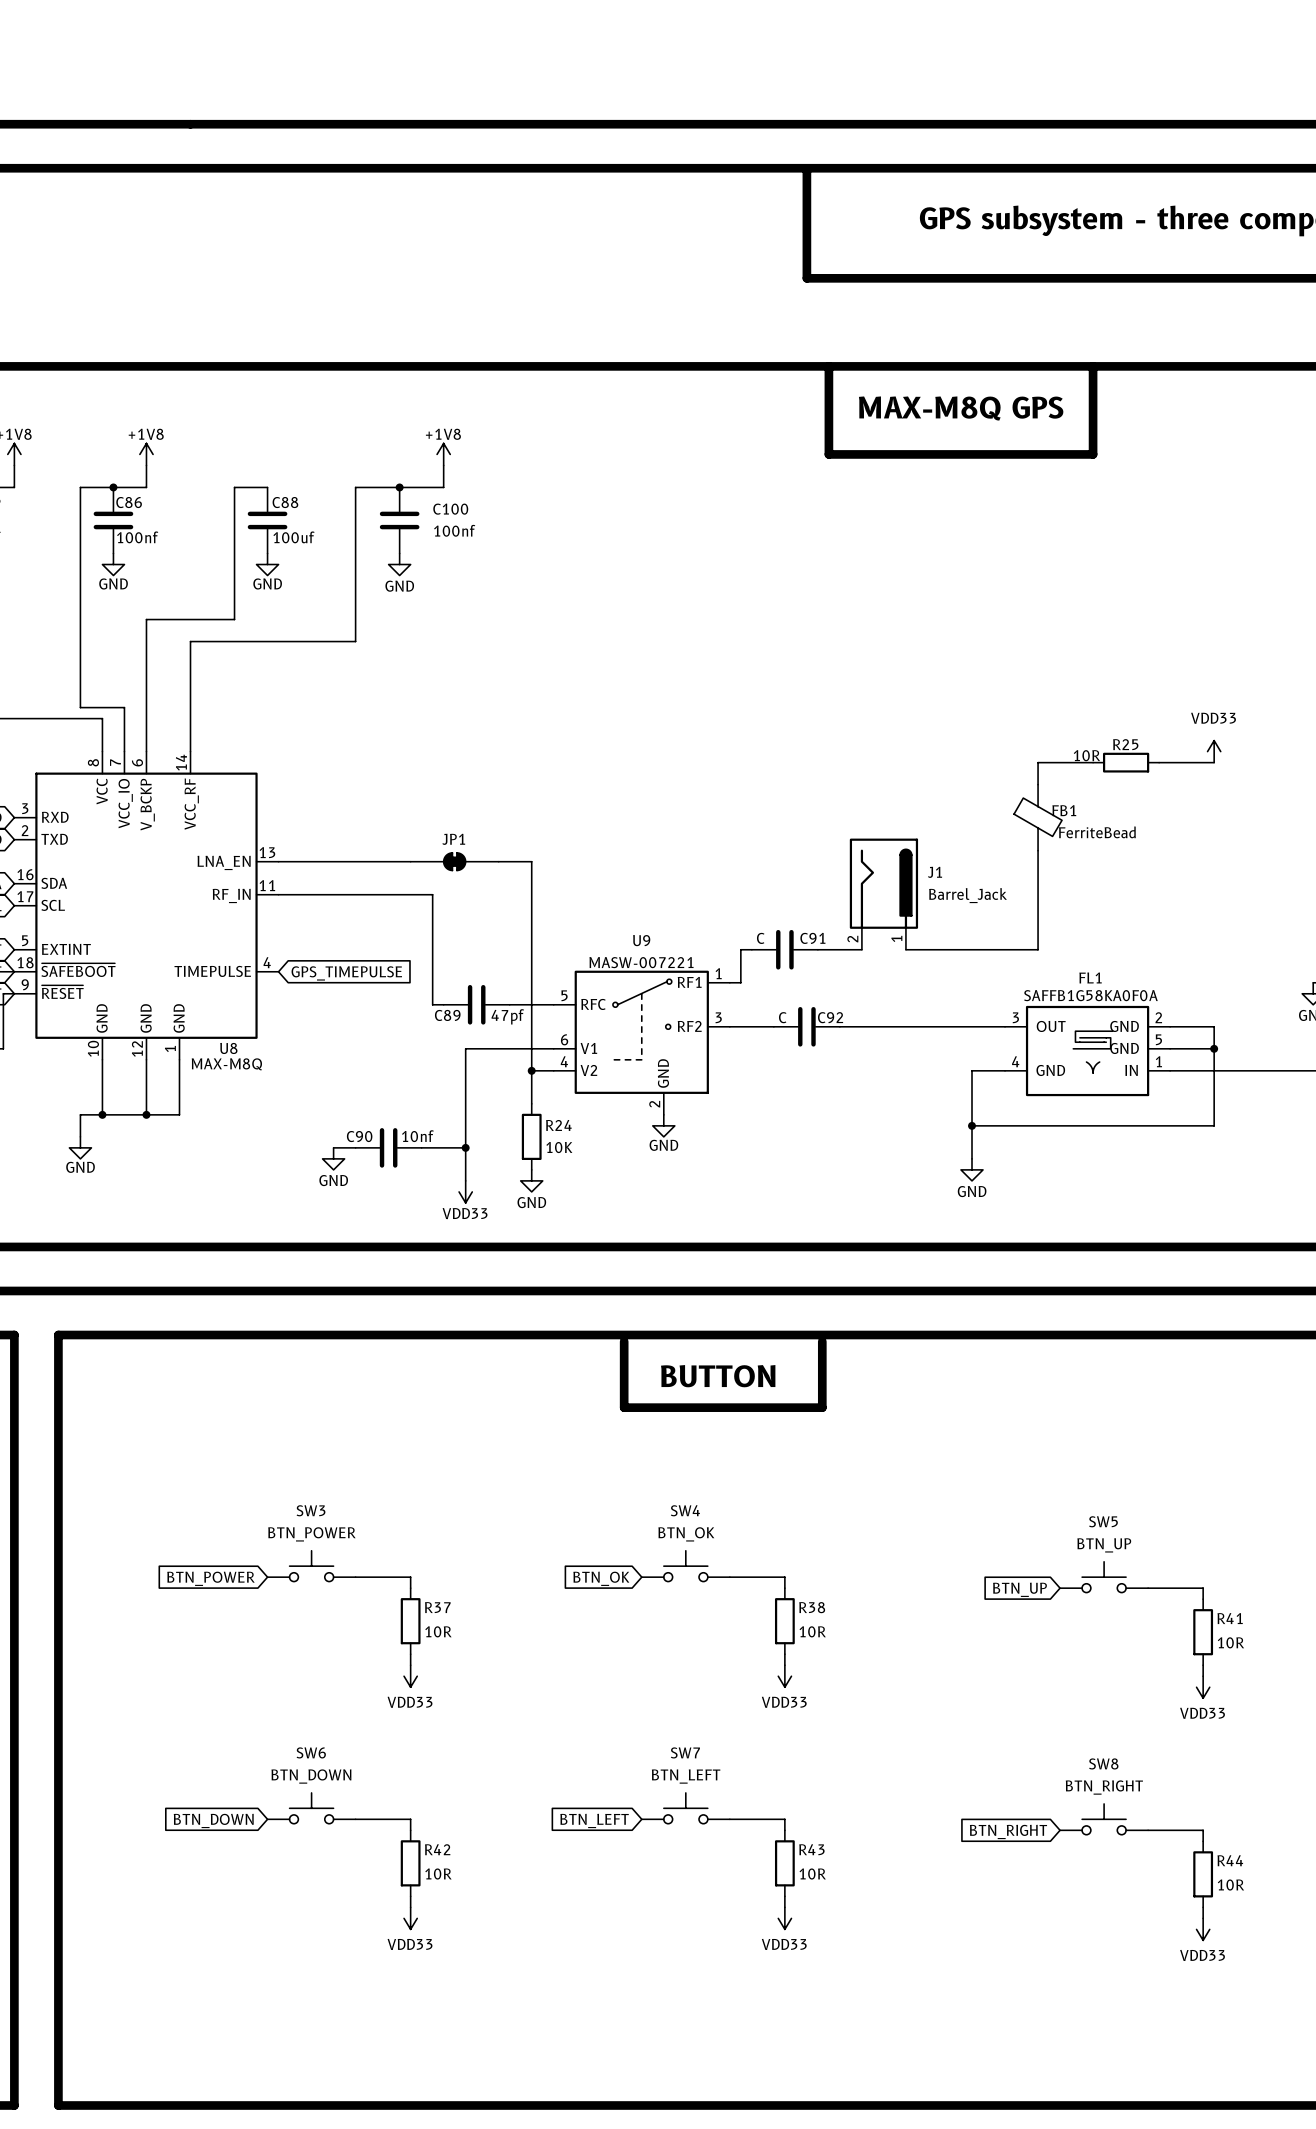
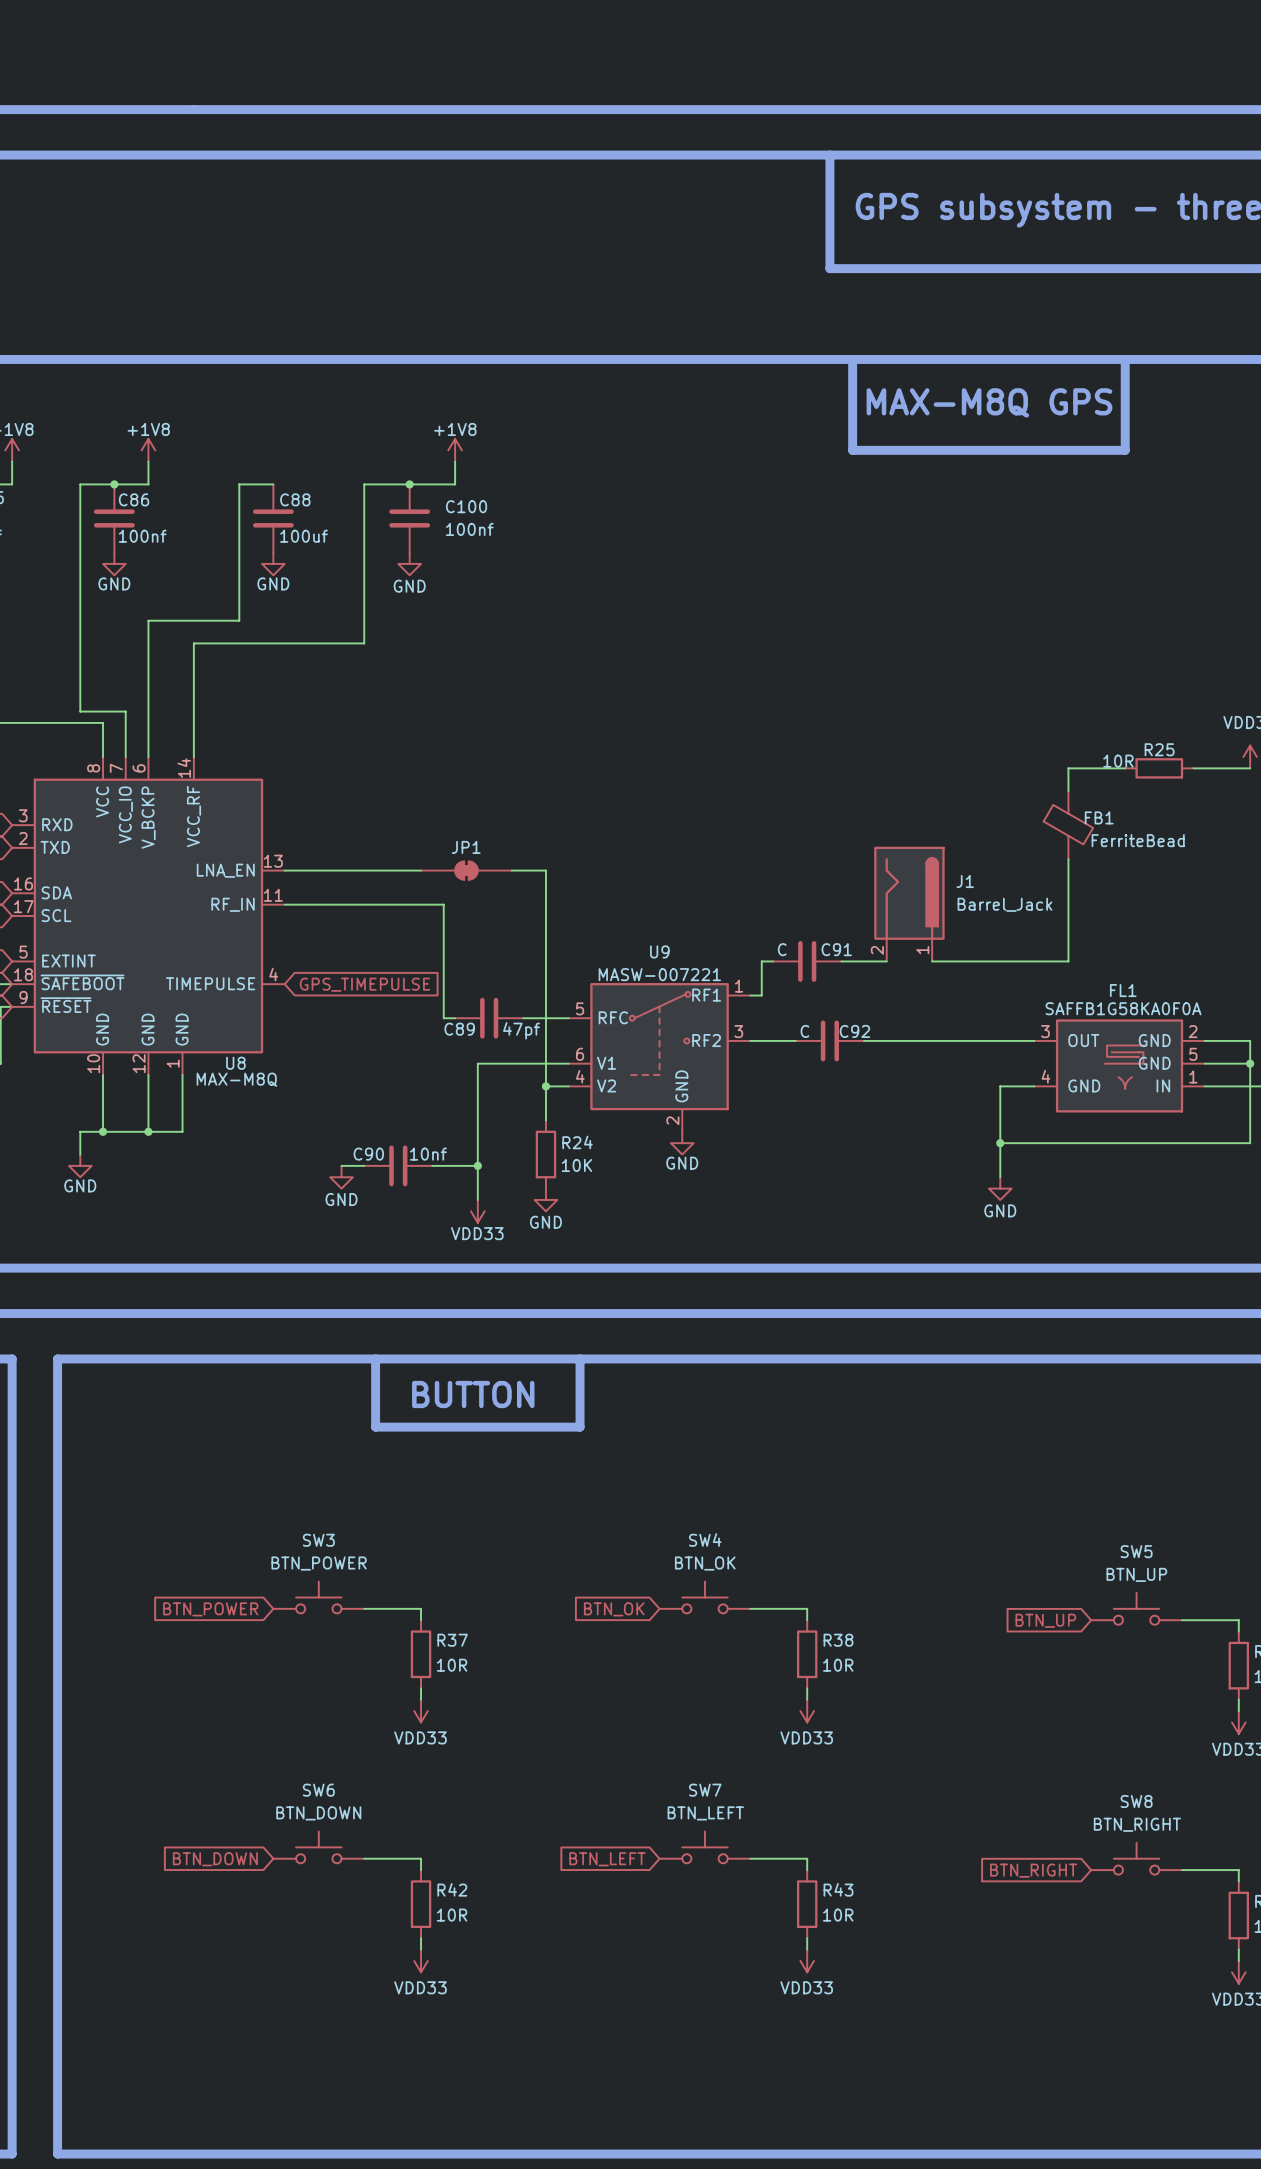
line: none -> (375, 1358) (375, 1427) (580, 1427) (580, 1358)
line: (624, 1341) (624, 1407) (822, 1407) (822, 1341) -> none
text: none -> BUTTON (473, 1394)
text: BUTTON (718, 1376) -> none

